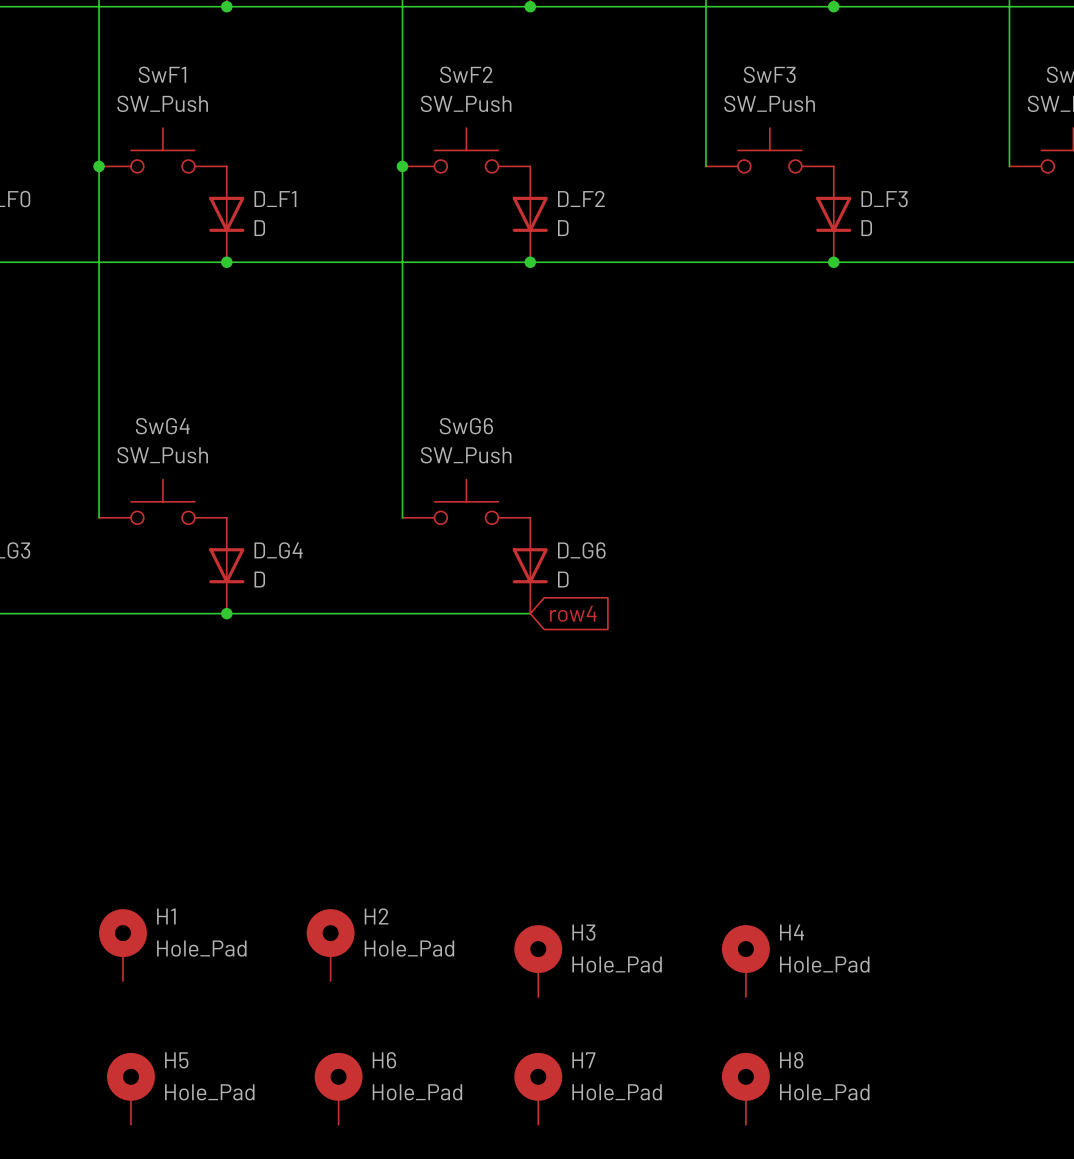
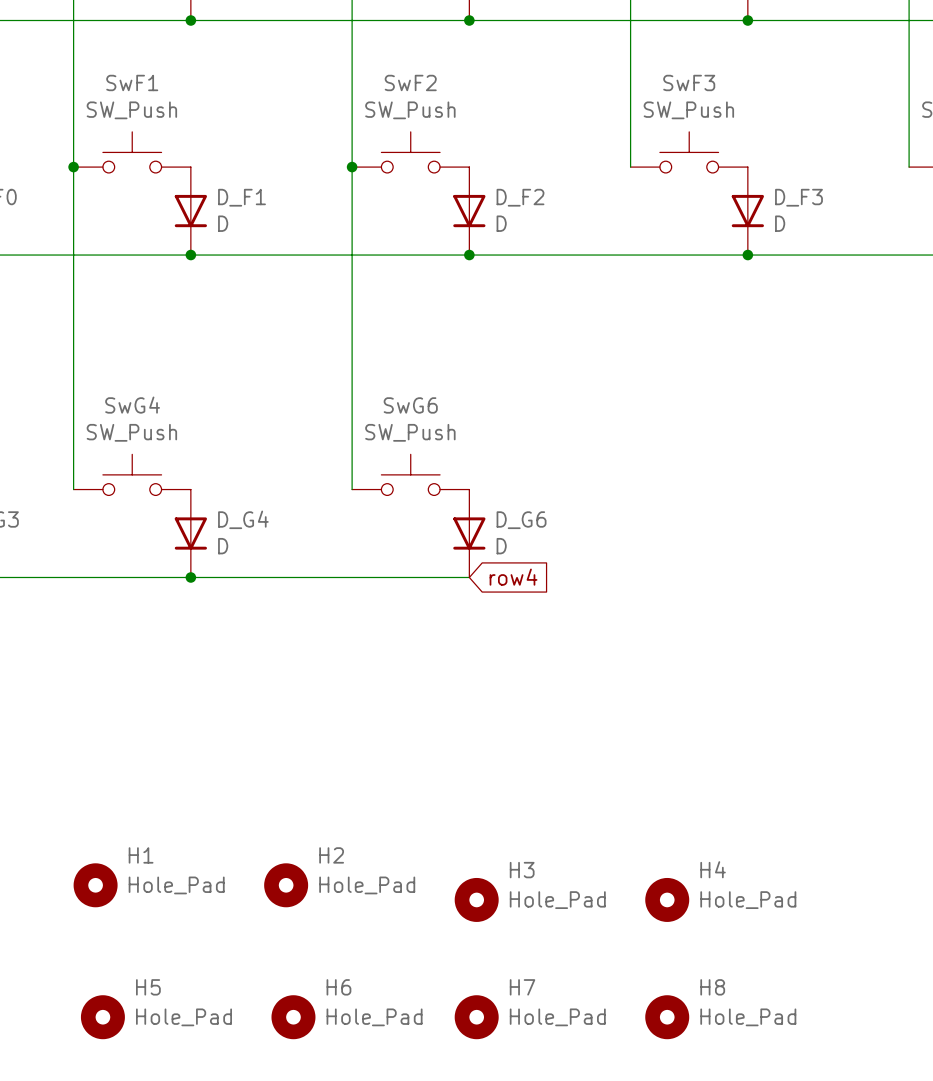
H1 symbol: [99, 909, 147, 982] -> [73, 863, 118, 908]
H2 symbol: [306, 909, 355, 982] -> [264, 863, 309, 908]
H3 symbol: [514, 925, 563, 997] -> [454, 877, 499, 922]
H4 symbol: [721, 925, 770, 997] -> [645, 877, 690, 922]
H5 symbol: [107, 1052, 155, 1125] -> [80, 995, 125, 1040]
H6 symbol: [314, 1052, 363, 1125] -> [271, 995, 316, 1040]
H7 symbol: [514, 1052, 563, 1125] -> [454, 995, 499, 1040]
H8 symbol: [721, 1052, 770, 1125] -> [645, 995, 690, 1040]

